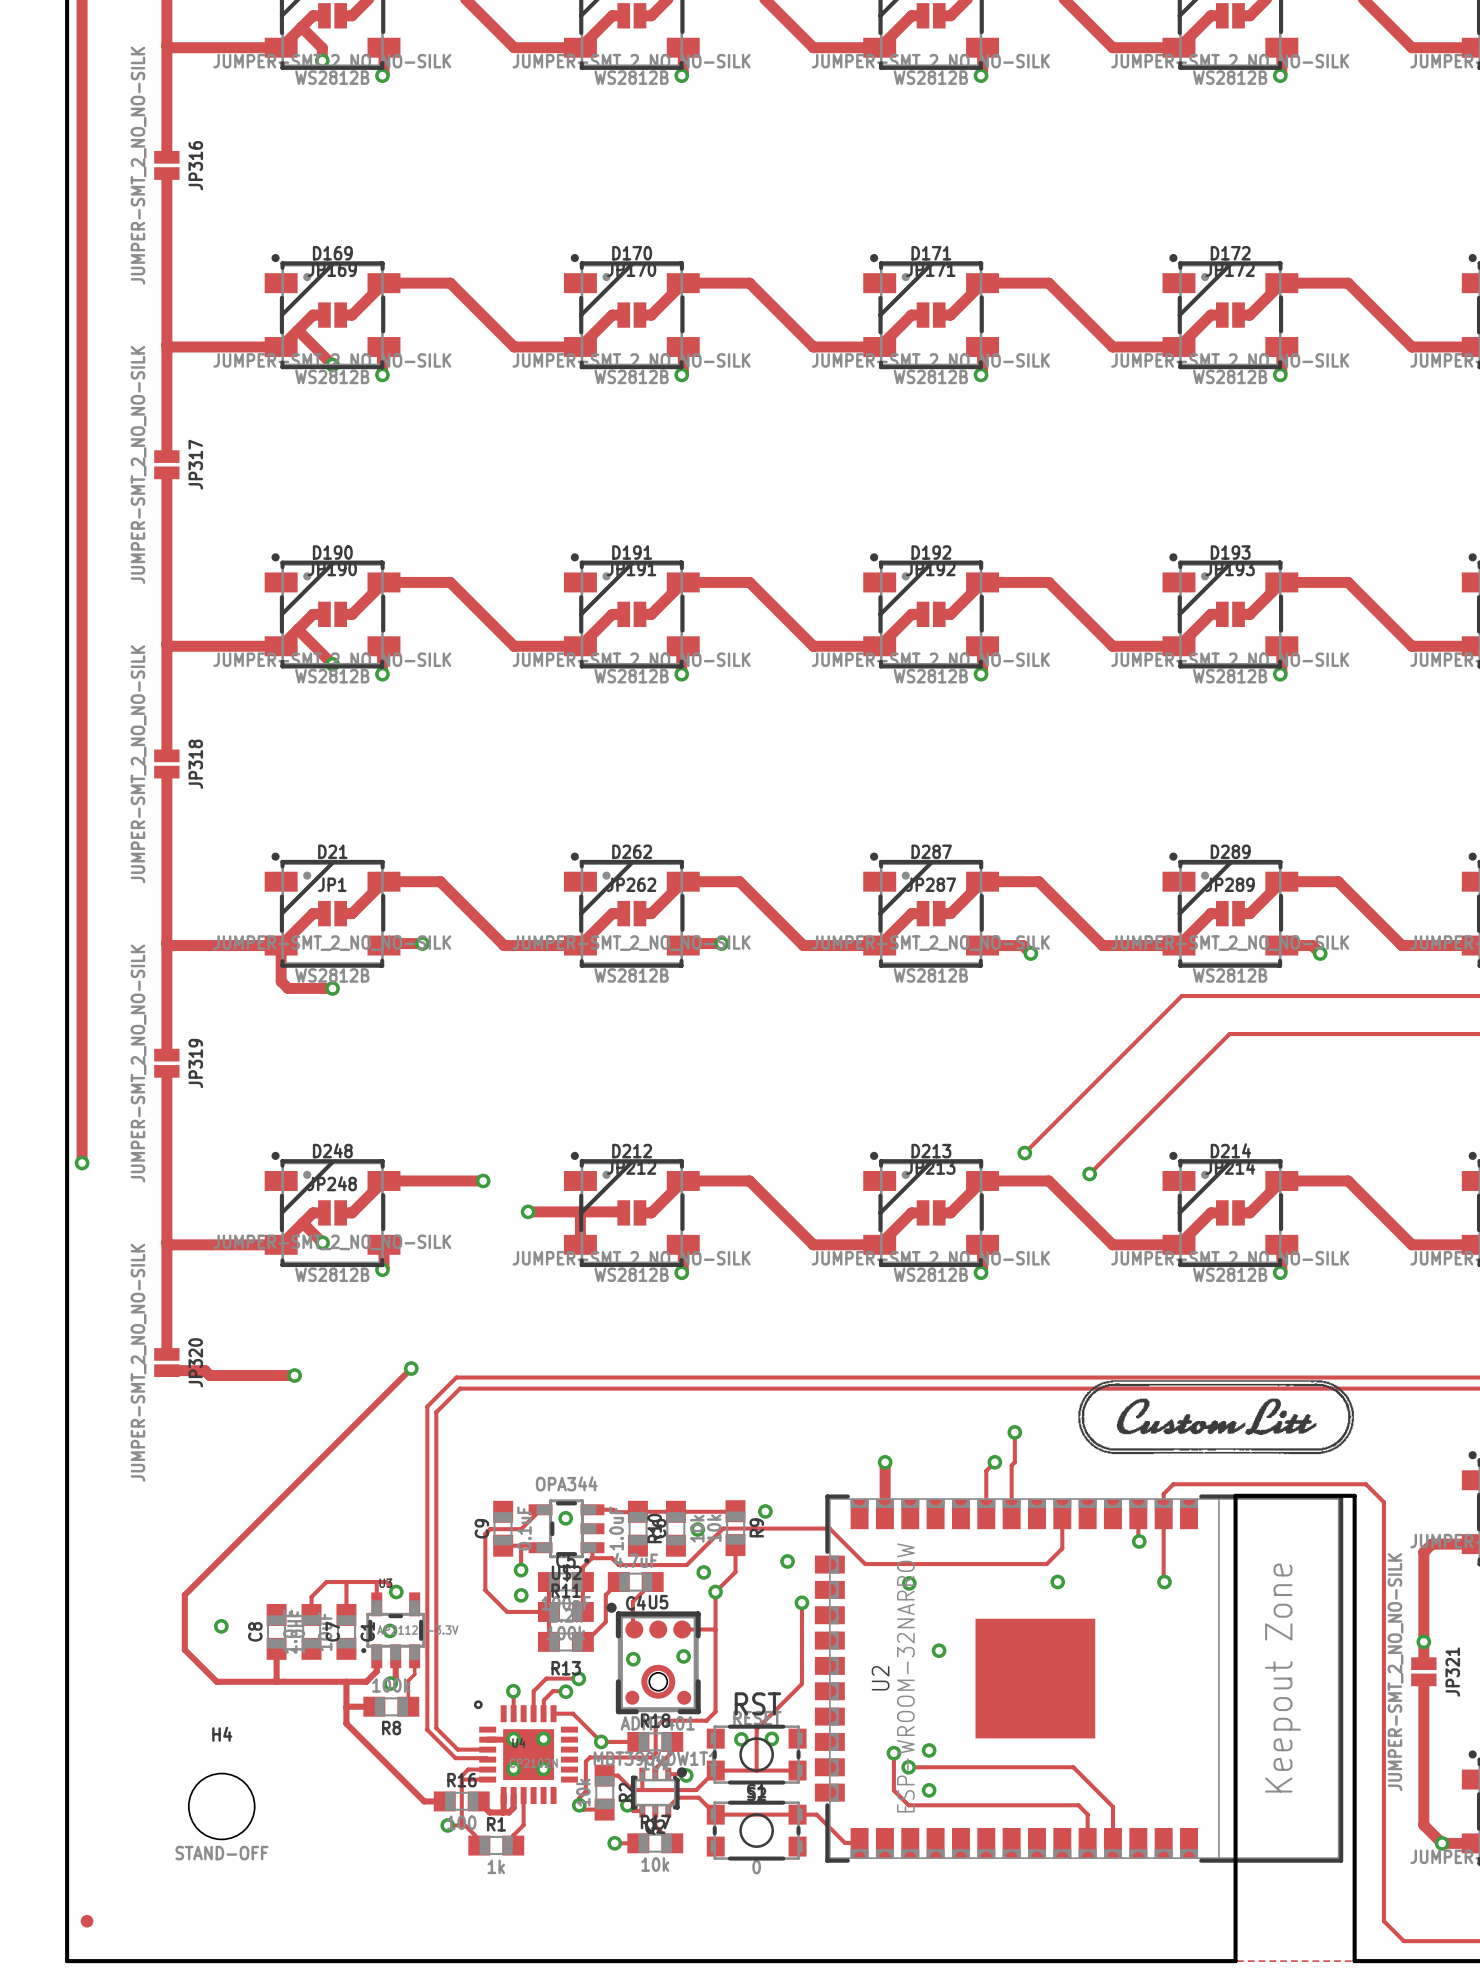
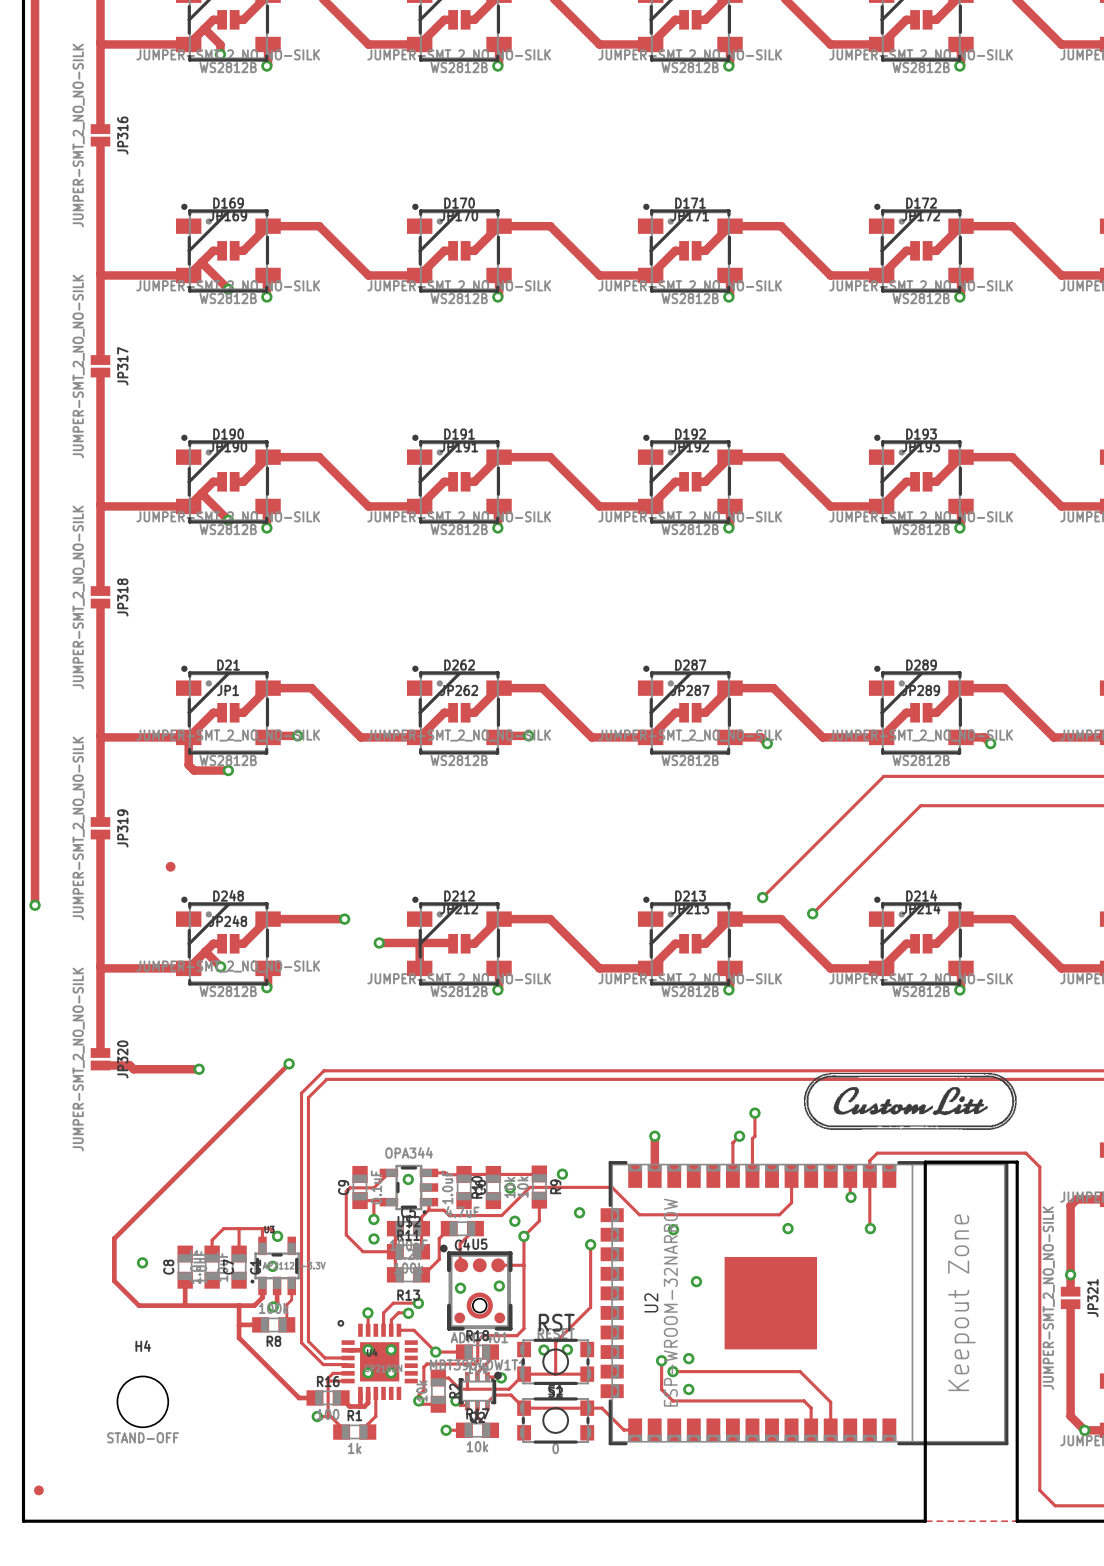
part: none -> (170, 866)

